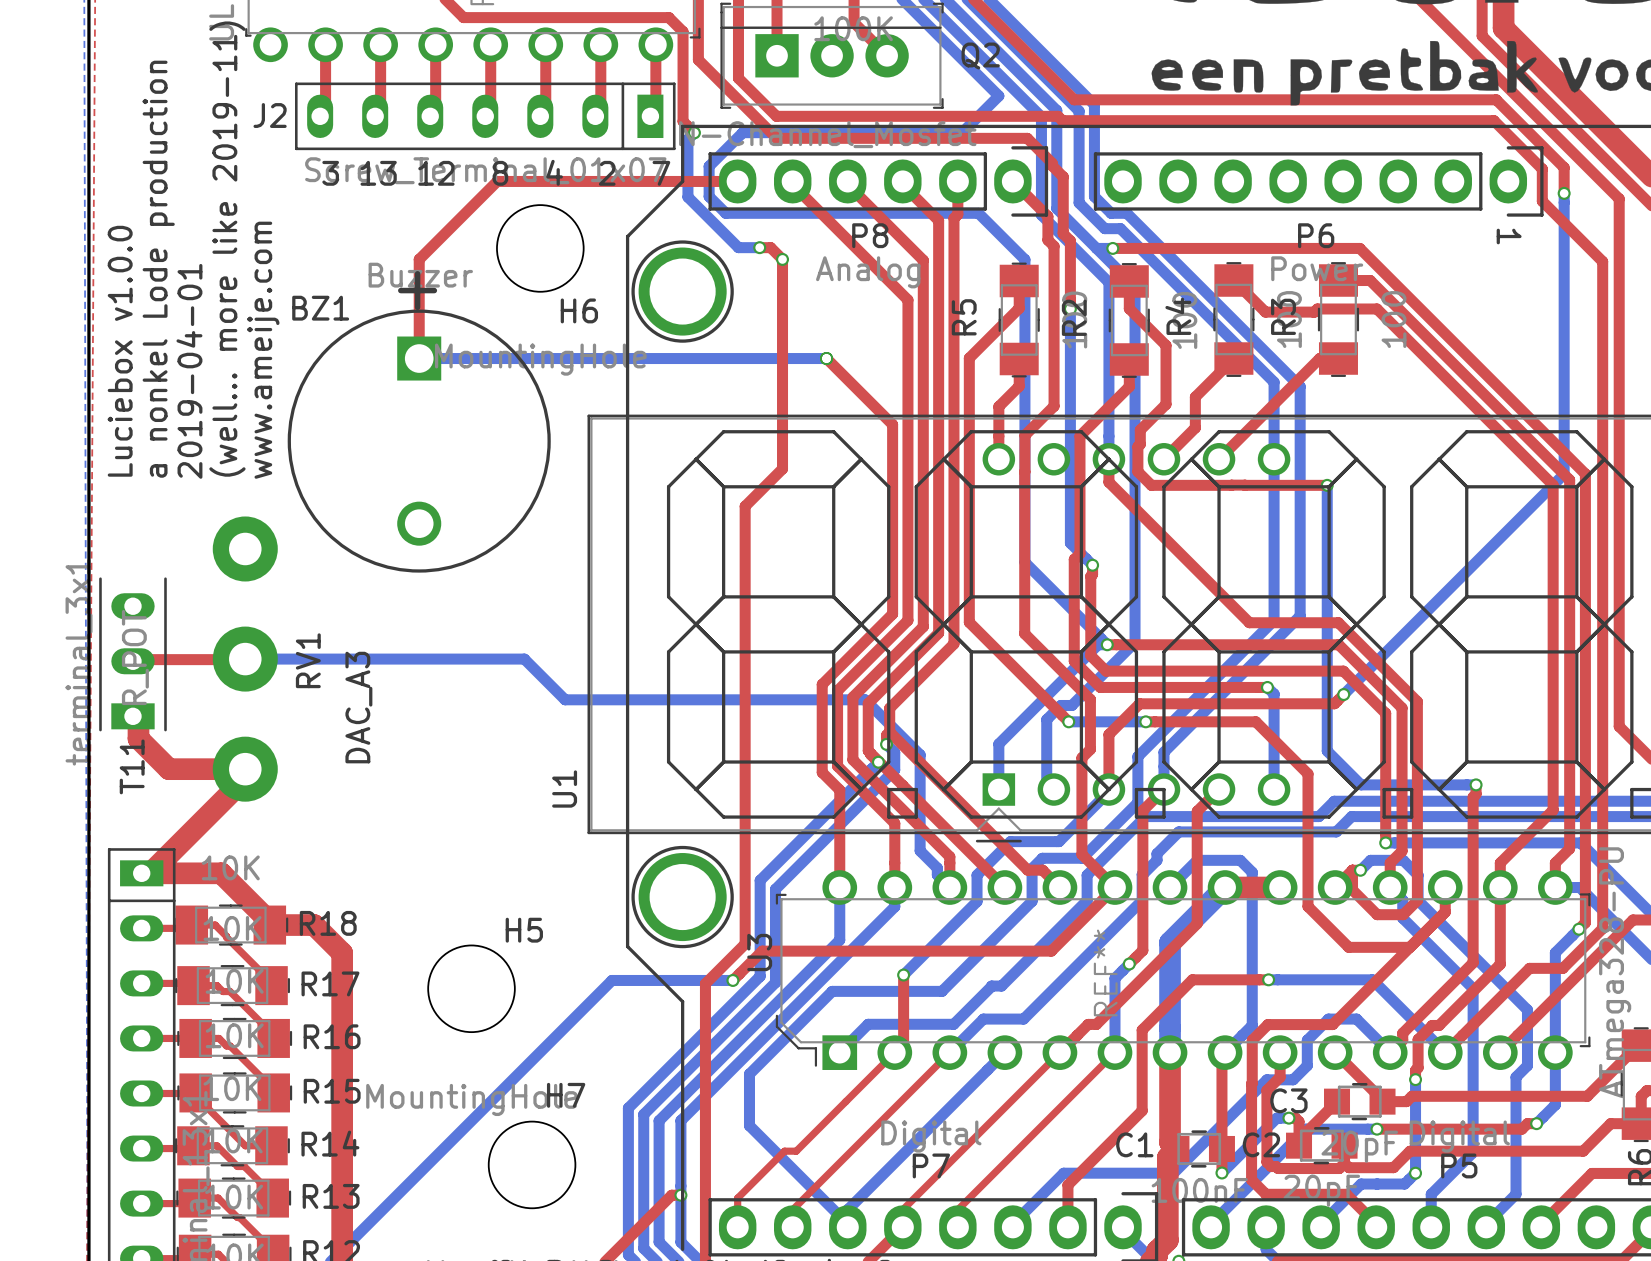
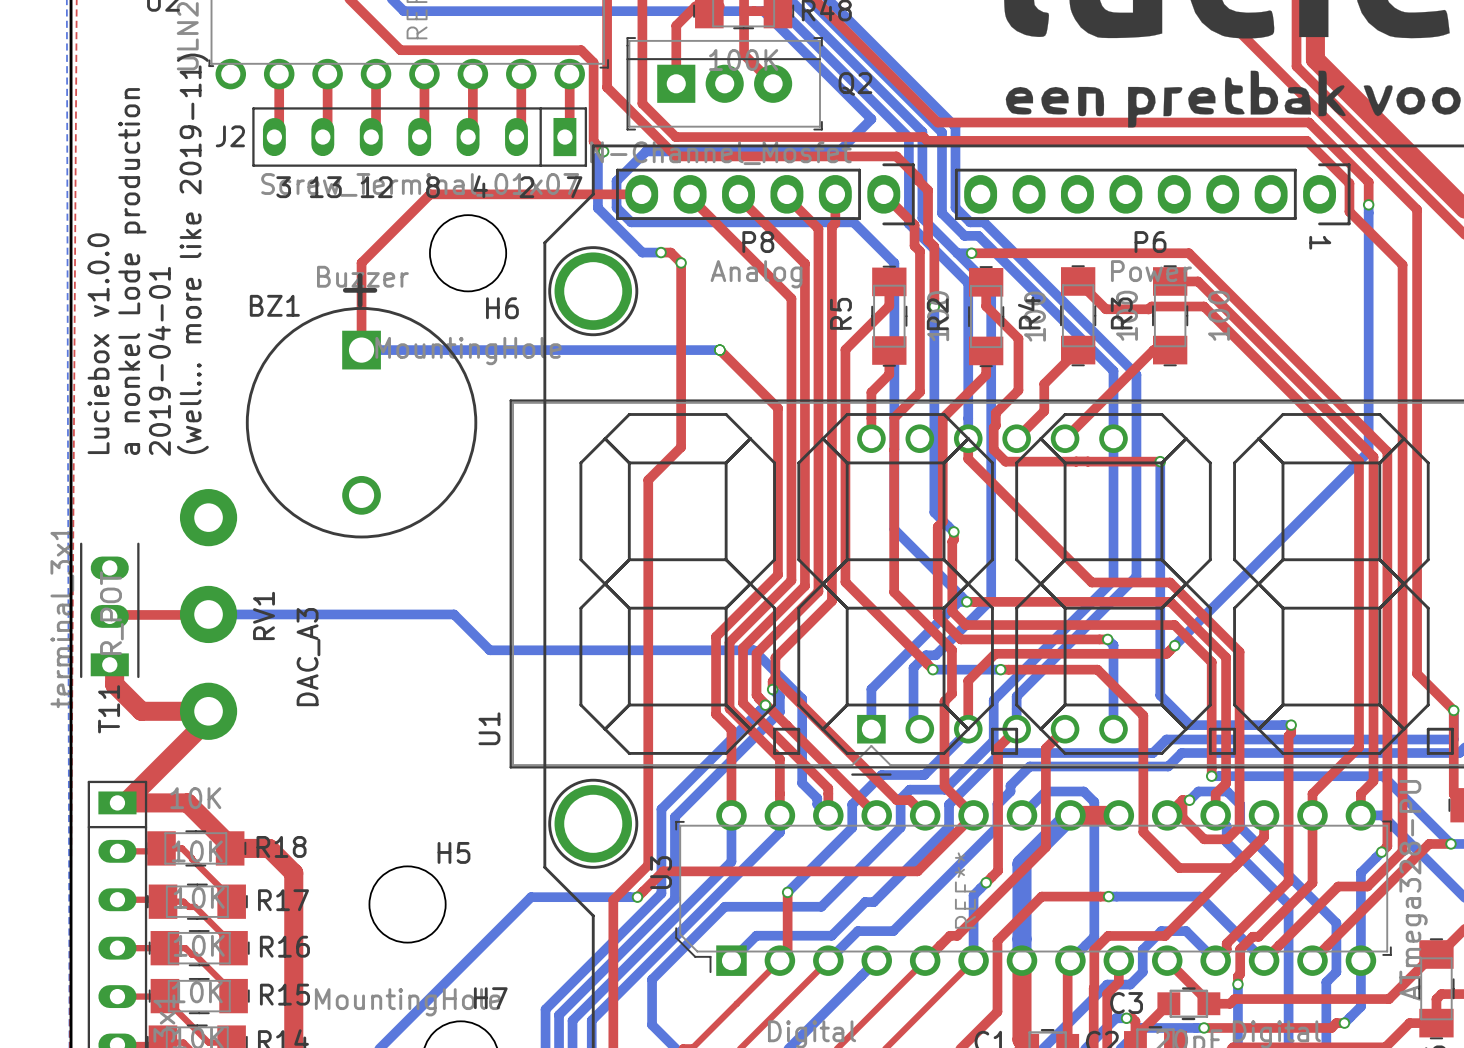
text: www.ameije.com (263, 350) -> none

